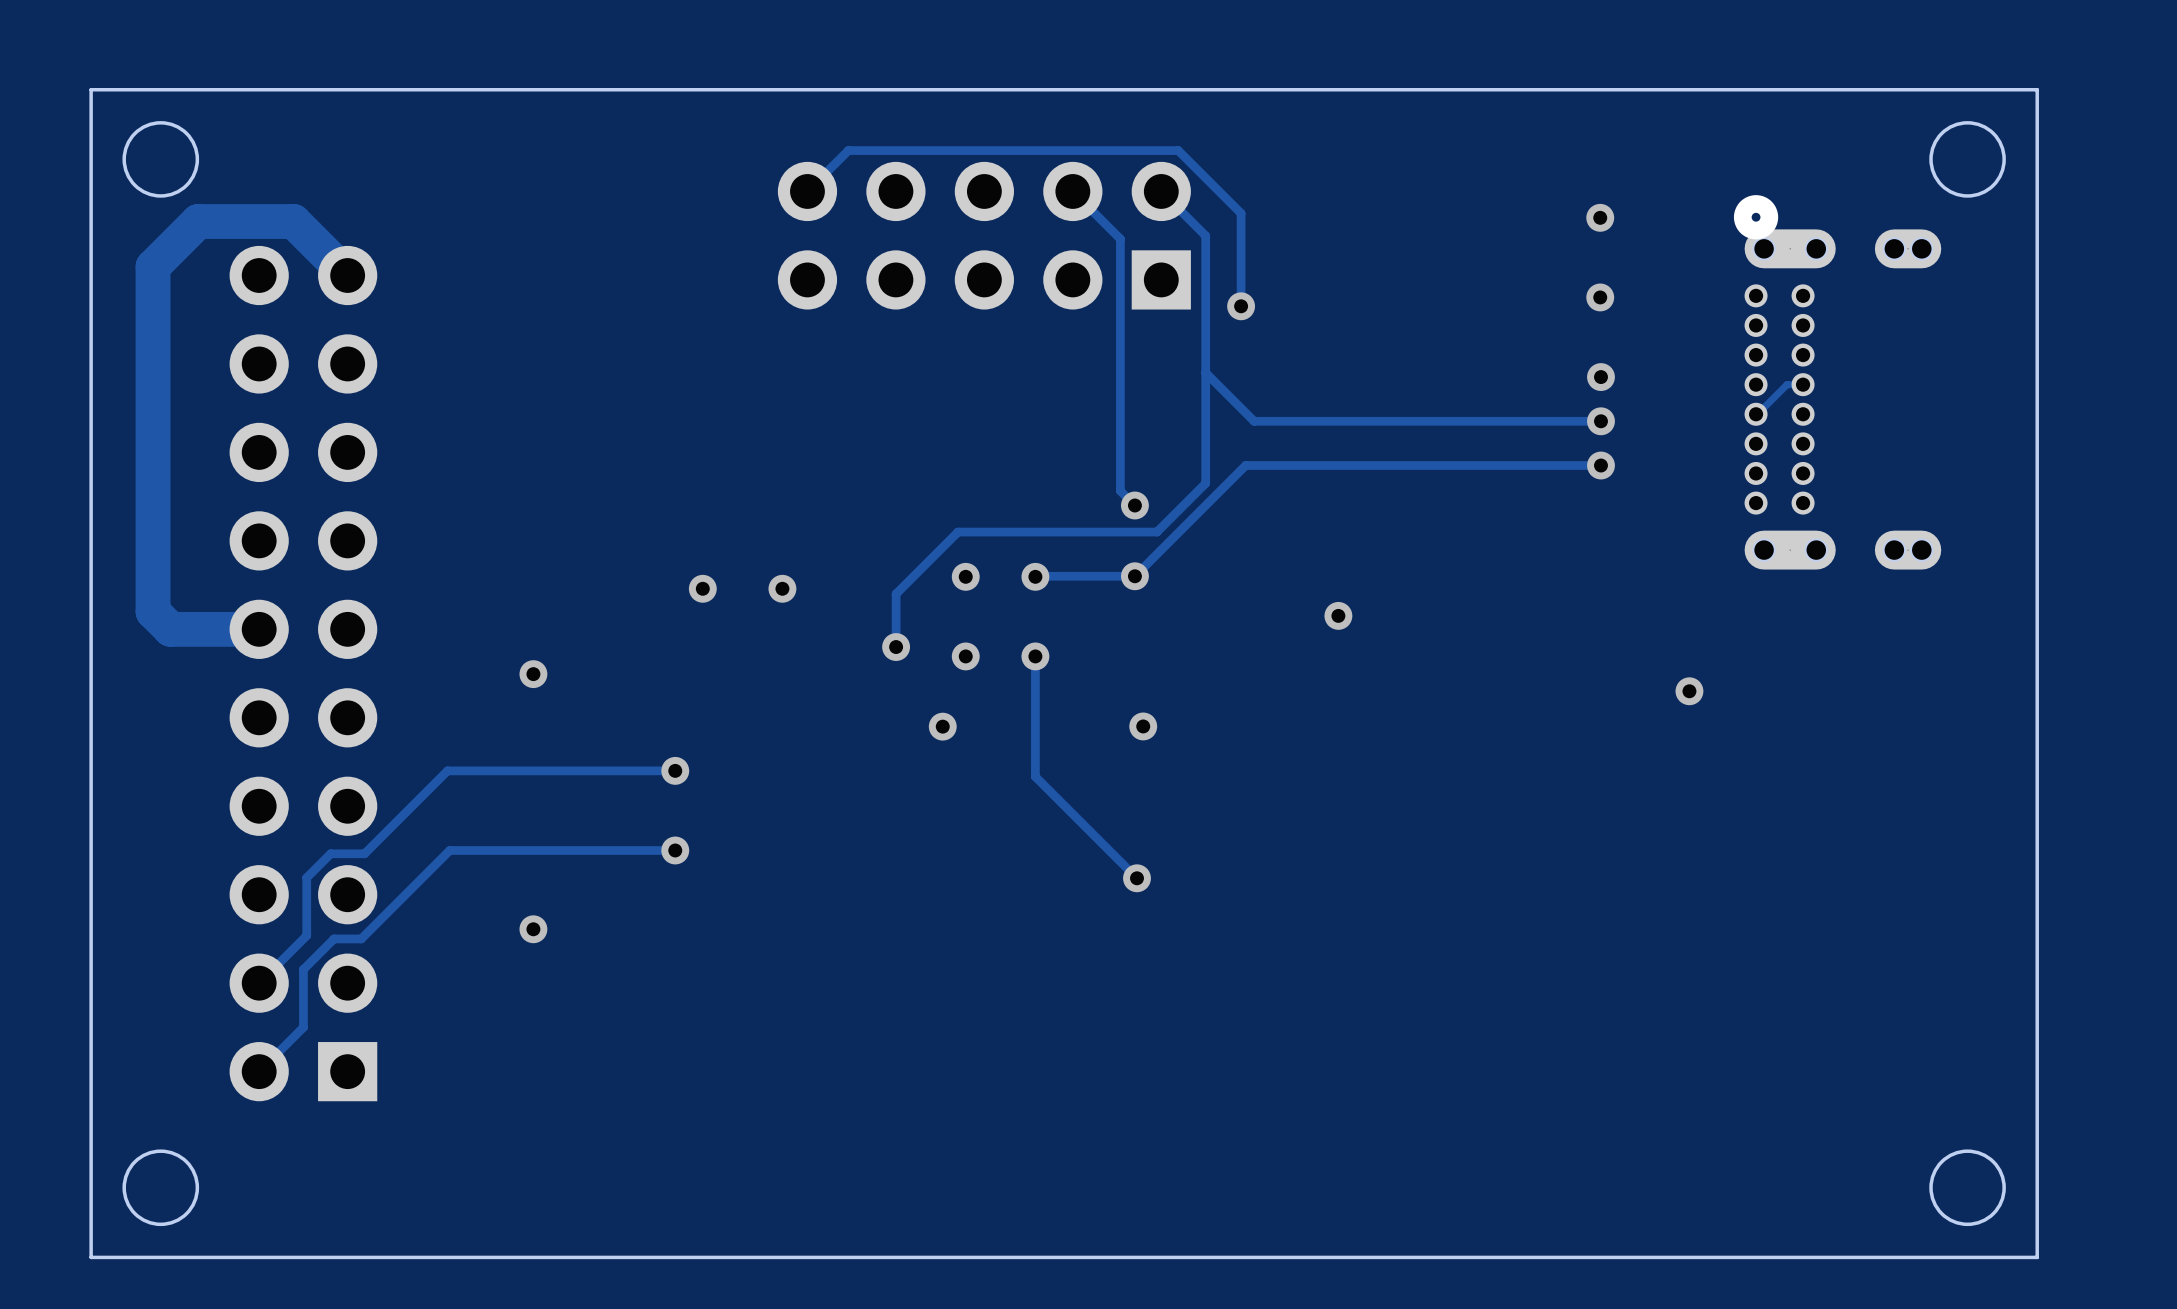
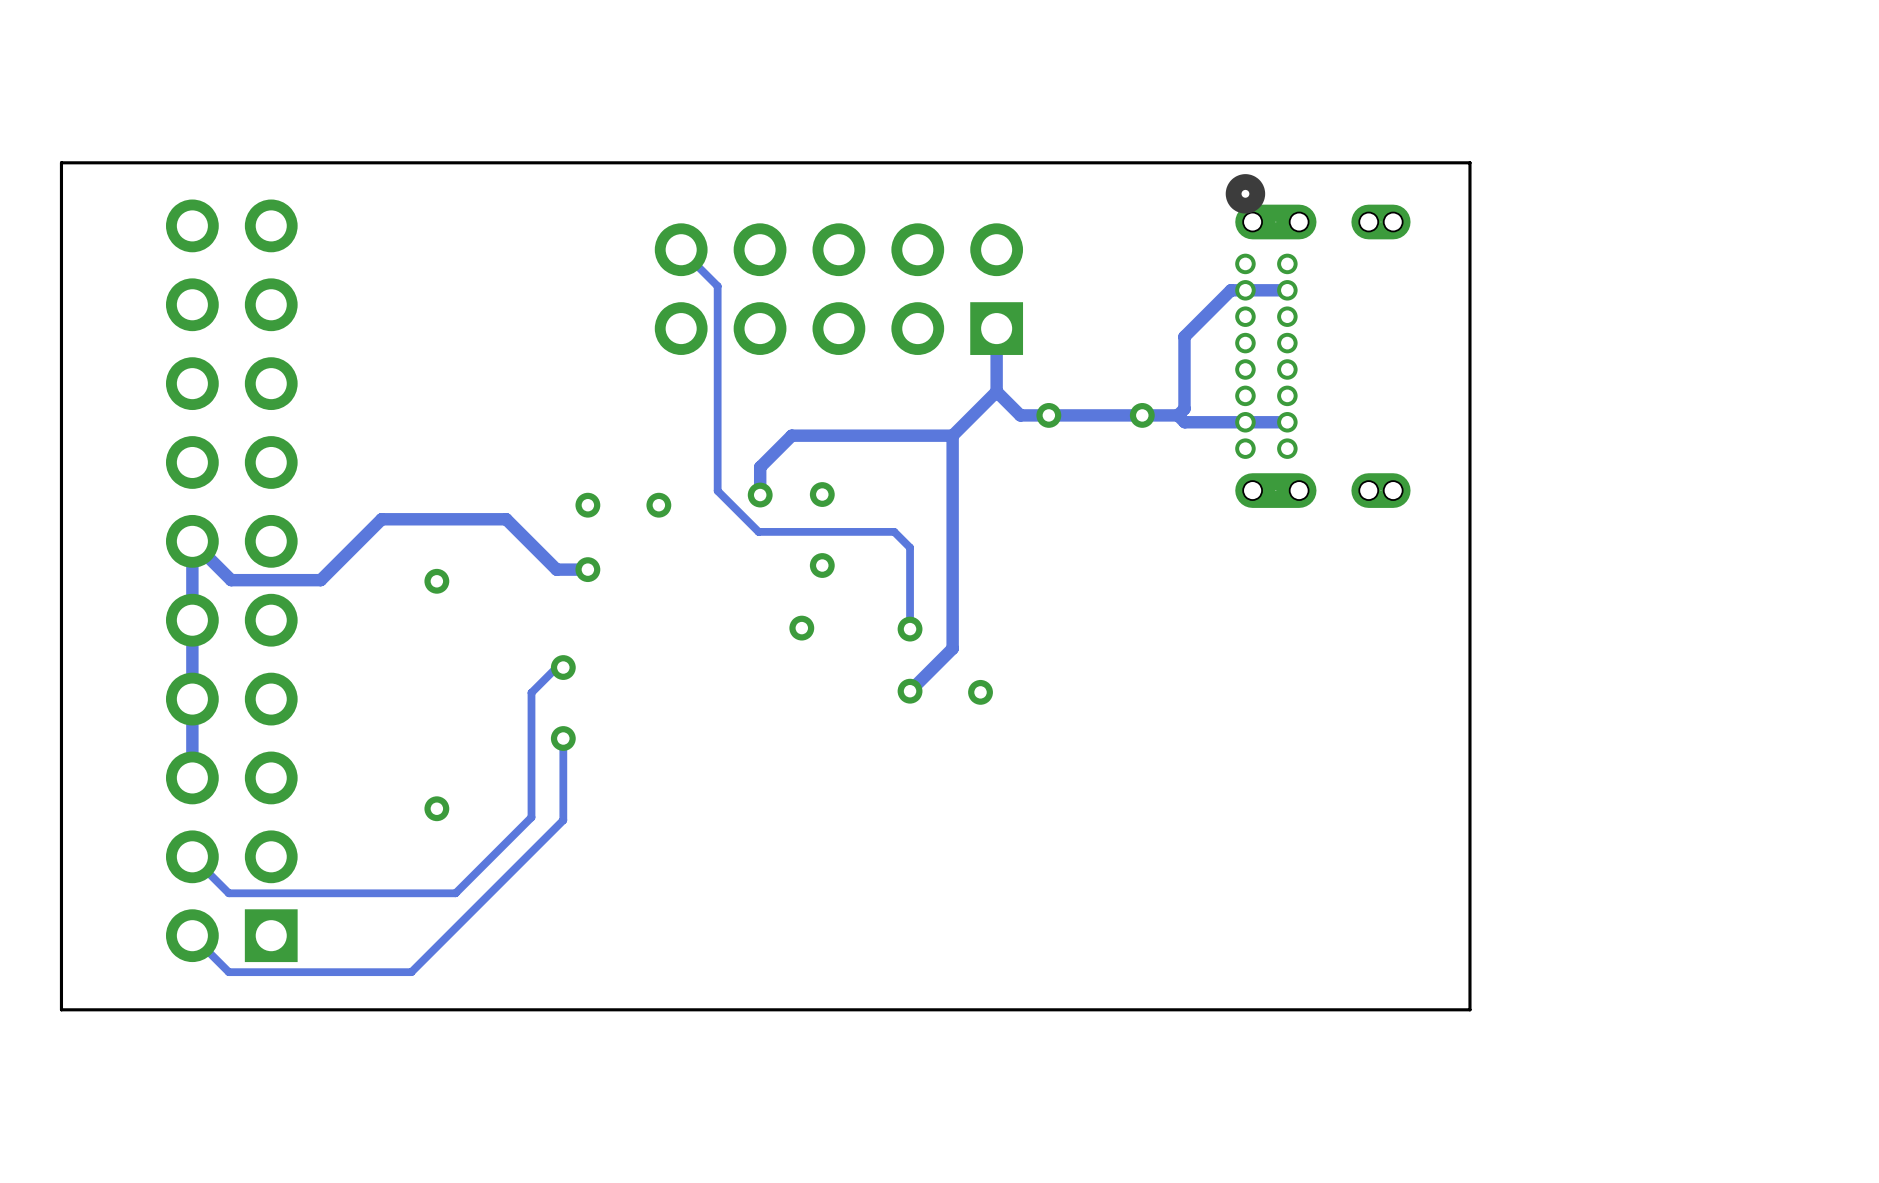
board edge: (2037, 89) (91, 89) (91, 1257) (2037, 1257) (2037, 89) -> (1469, 162) (1469, 1009) (61, 1009) (61, 162) (1469, 162)
round board edge: [122, 121, 200, 198] -> none
round board edge: [1929, 121, 2006, 198] -> none
track: (807, 191) (848, 150) (1178, 150) (1241, 213) (1241, 306) -> none
track: (1072, 191) (1120, 239) (1120, 490) (1134, 505) -> none
track: (1161, 191) (1205, 235) (1205, 483) (1157, 532) (958, 532) (896, 593) (896, 647) -> none
via: (1600, 217) -> none
part position: (984, 235) -> (838, 289)
track: (347, 275) (293, 221) (198, 221) (153, 266) (153, 611) (170, 629) (259, 629) -> none
via: (1600, 297) -> none
track: none -> (681, 249) (717, 286) (717, 490) (758, 531) (894, 531) (910, 547) (910, 629)
via: (1241, 306) -> none
track: none -> (1287, 290) (1230, 290) (1184, 336) (1184, 408) (1177, 415)
track: (1205, 372) (1254, 421) (1600, 421) -> none
via: (1600, 377) -> none
part position: (1837, 382) -> (1318, 341)
track: (1803, 384) (1787, 384) (1756, 414) -> none
track: none -> (996, 328) (996, 391)
via: (1600, 421) -> none
track: none -> (996, 391) (1020, 415) (1177, 415)
track: none -> (996, 391) (952, 435)
track: (1600, 465) (1245, 465) (1134, 576) (1035, 576) -> none
via: (1600, 465) -> none
via: none -> (1048, 415)
via: none -> (1142, 415)
track: none -> (1177, 415) (1184, 422) (1287, 422)
via: (1134, 505) -> none
track: none -> (952, 435) (791, 435) (760, 467) (760, 495)
track: none -> (952, 435) (952, 648) (910, 691)
via: (1035, 576) -> none
via: (1134, 576) -> none
via: none -> (760, 495)
via: (1338, 615) -> none
via: (896, 647) -> none
track: (1035, 656) (1035, 776) (1136, 878) -> none
via: (1035, 656) -> none
track: none -> (587, 569) (556, 569) (506, 519) (381, 519) (320, 580) (231, 580) (192, 541) (192, 777)
via: none -> (587, 569)
via: (1689, 691) -> none
via: (1143, 726) -> none
via: none -> (910, 629)
track: (667, 770) (447, 770) (364, 853) (330, 853) (306, 877) (306, 935) (259, 983) -> (556, 667) (531, 692) (531, 817) (455, 893) (228, 893) (192, 856)
via: none -> (910, 691)
via: none -> (980, 692)
track: (675, 850) (449, 850) (361, 938) (334, 938) (303, 969) (303, 1027) (259, 1071) -> (563, 738) (563, 820) (411, 972) (228, 972) (192, 935)
via: (1136, 878) -> none
round board edge: [122, 1149, 200, 1227] -> none
round board edge: [1929, 1149, 2006, 1227] -> none

